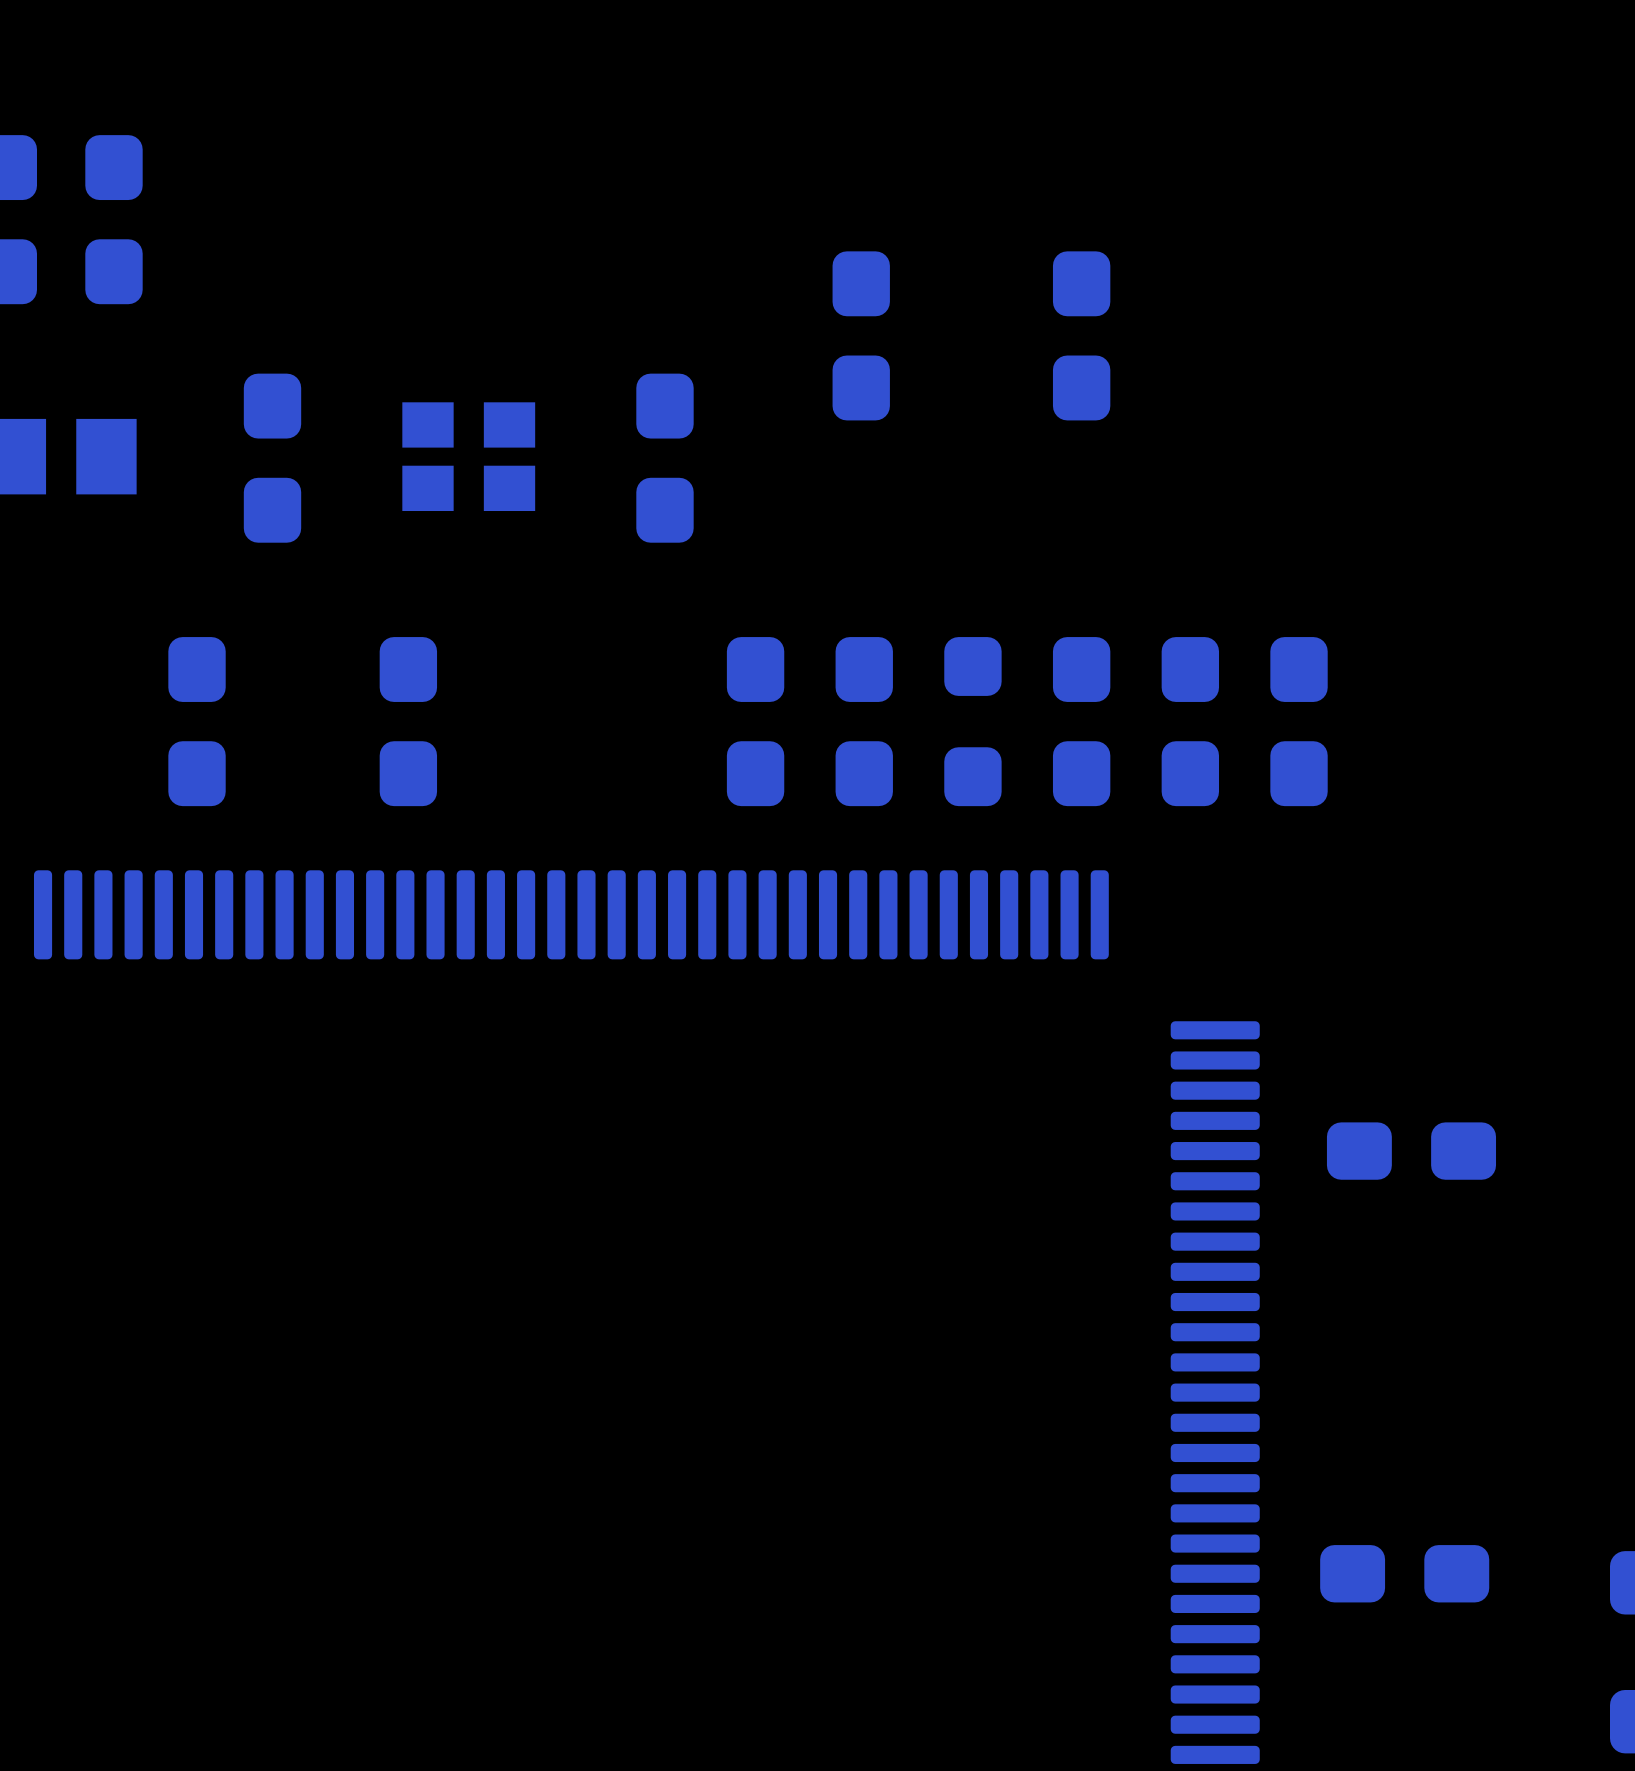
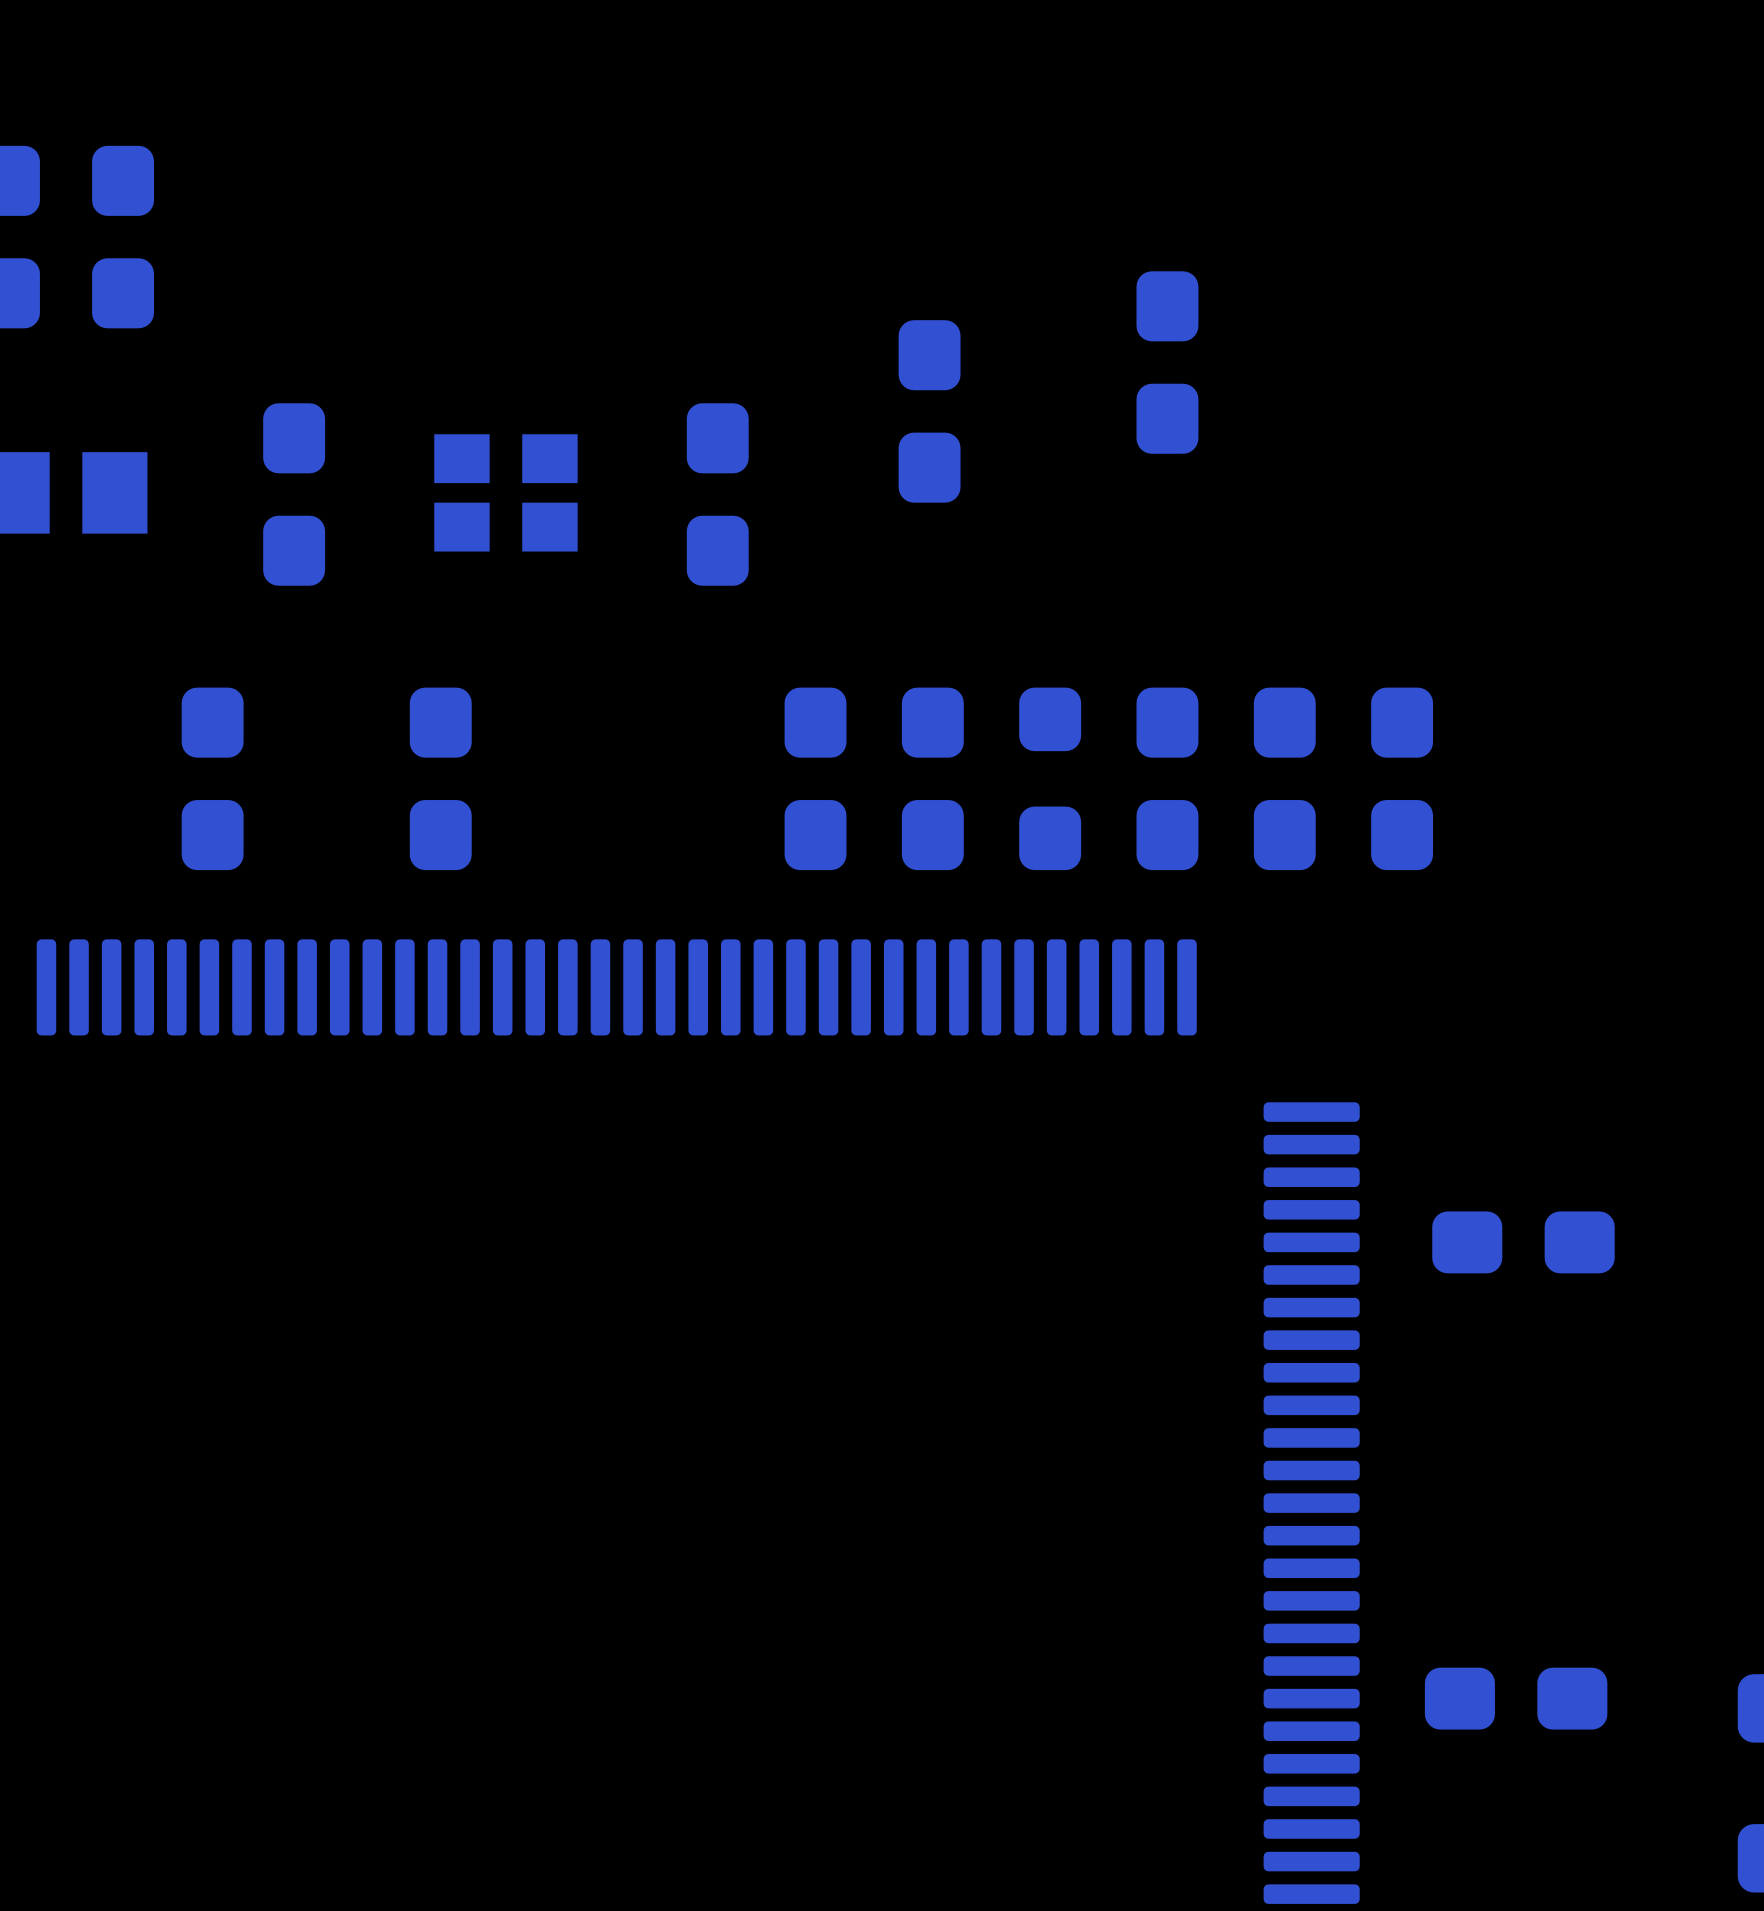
part position: (861, 335) -> (929, 411)

